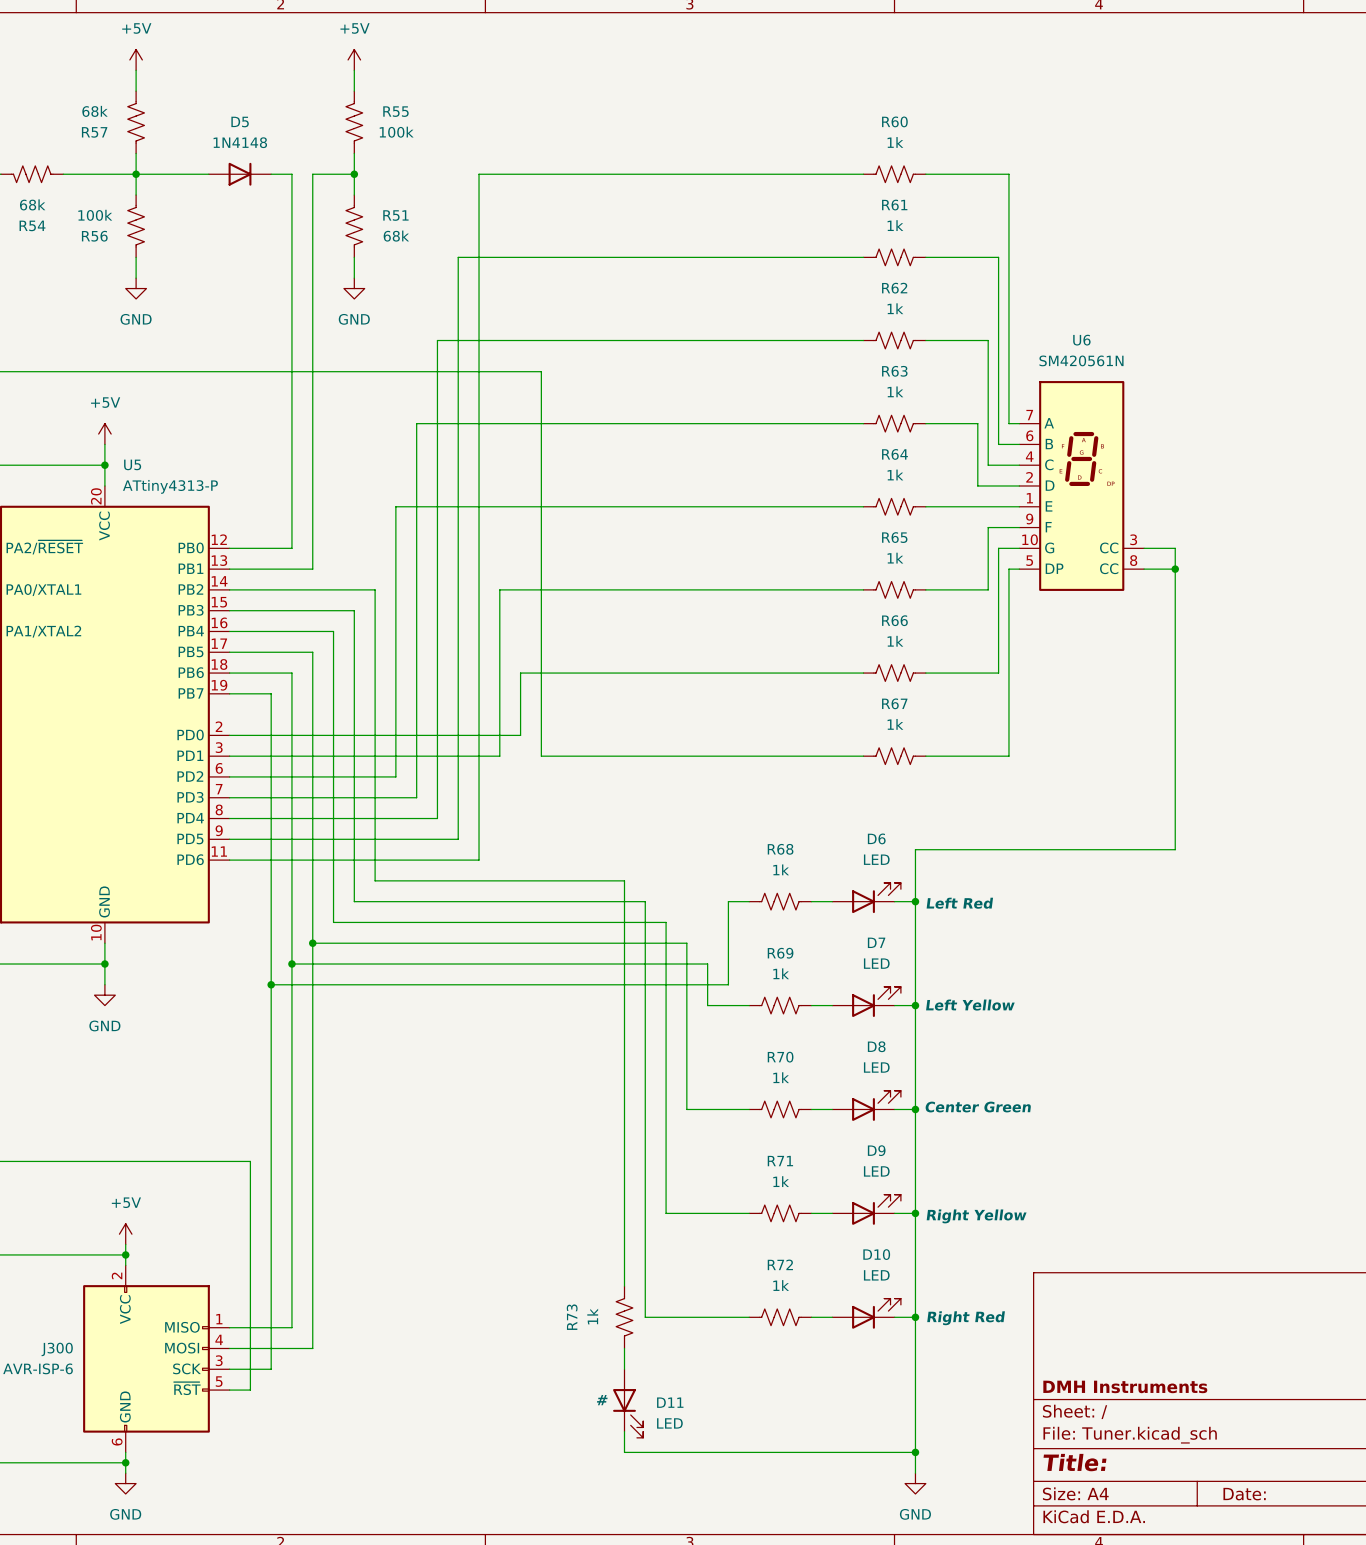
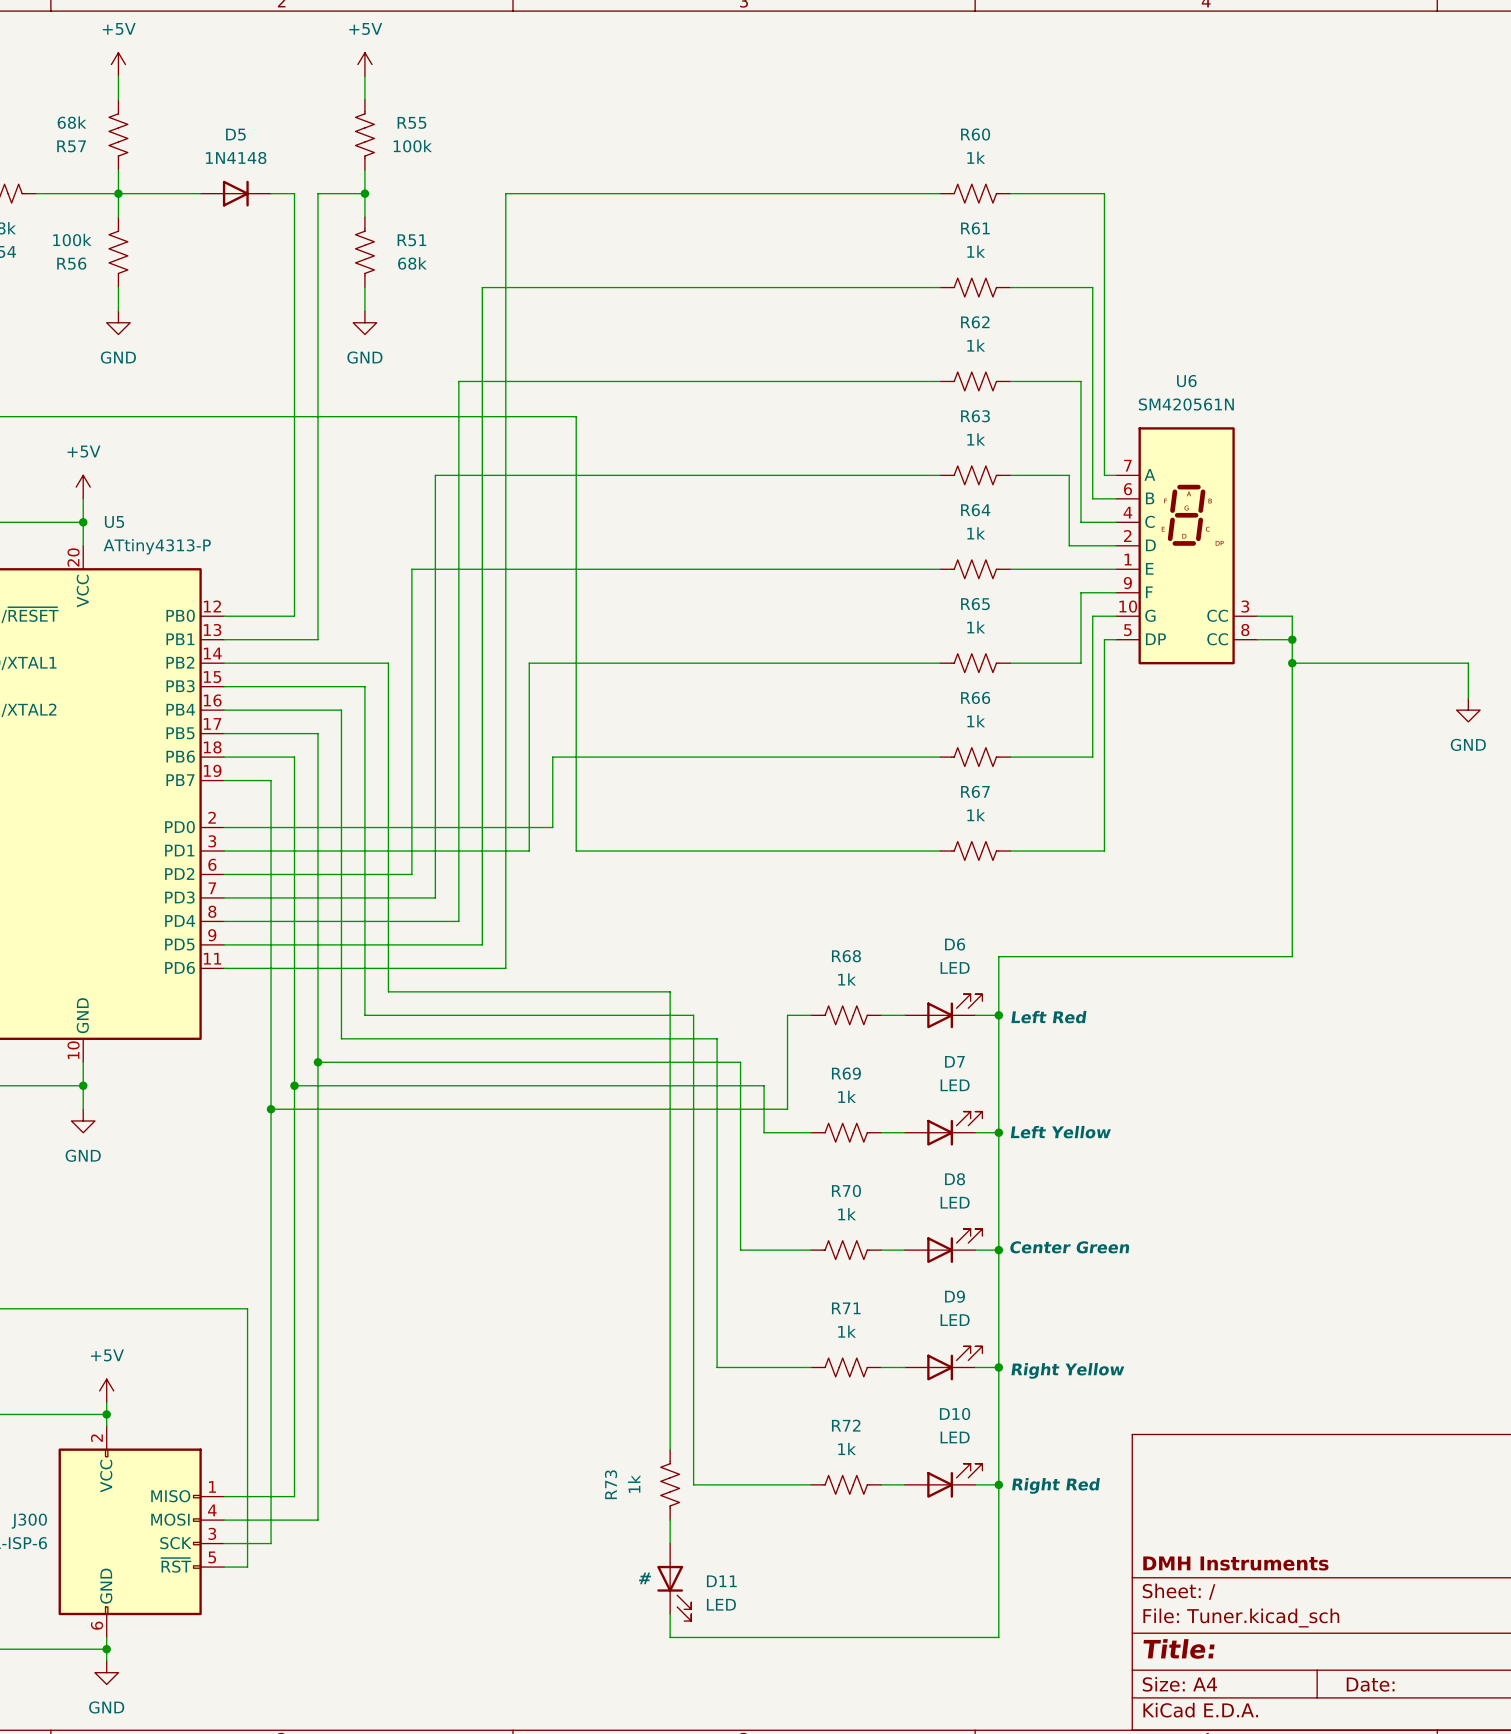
wire: none -> (1292, 663) (1468, 663) (1468, 698)
junction: none -> (1292, 663)
power symbol: none -> GND (1468, 710)
wire: (915, 1452) (915, 1473) -> none
junction: (915, 1452) -> none
power symbol: GND (915, 1483) -> none

